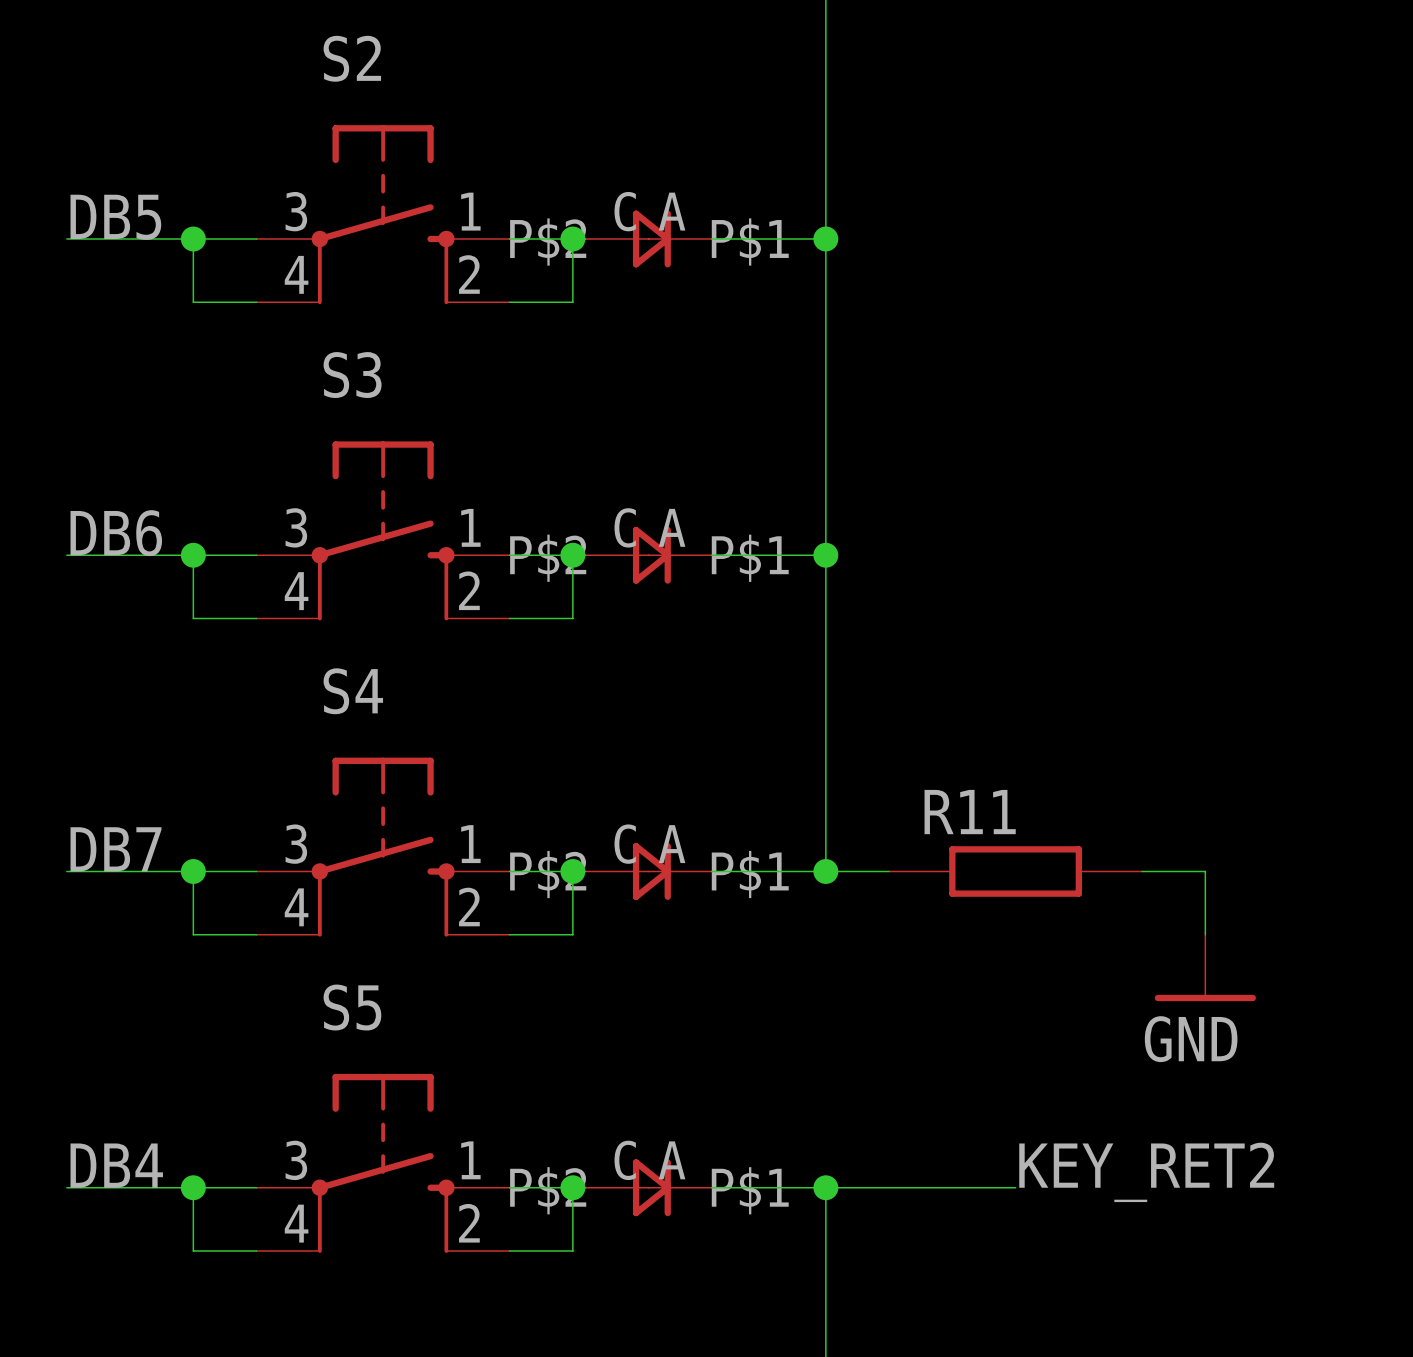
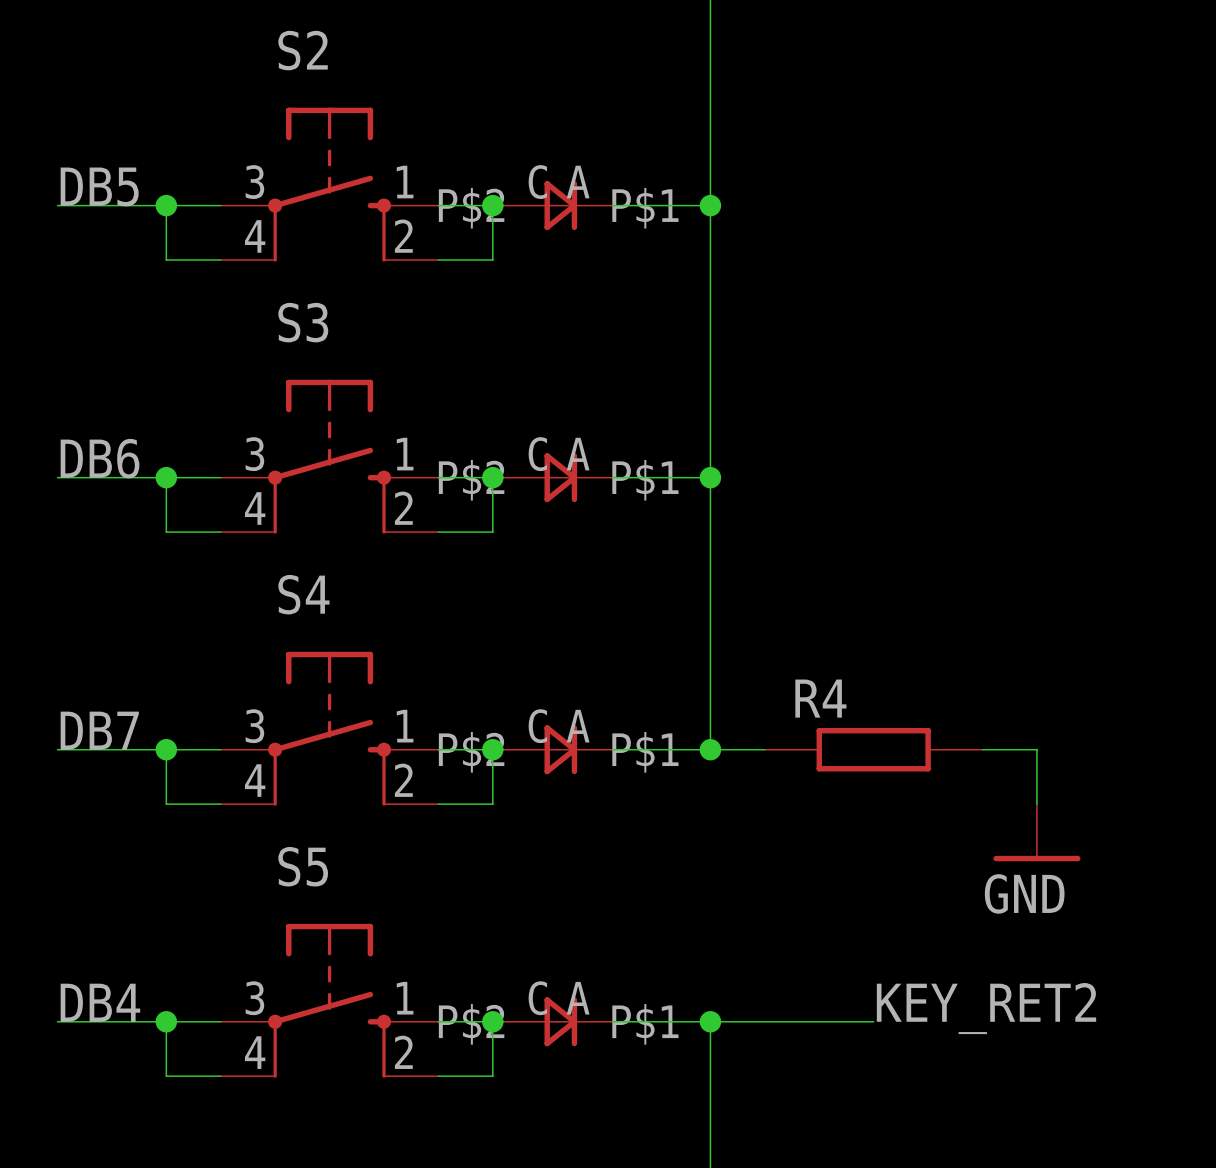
R11 name: R11 (970, 812) -> R4 (820, 698)

